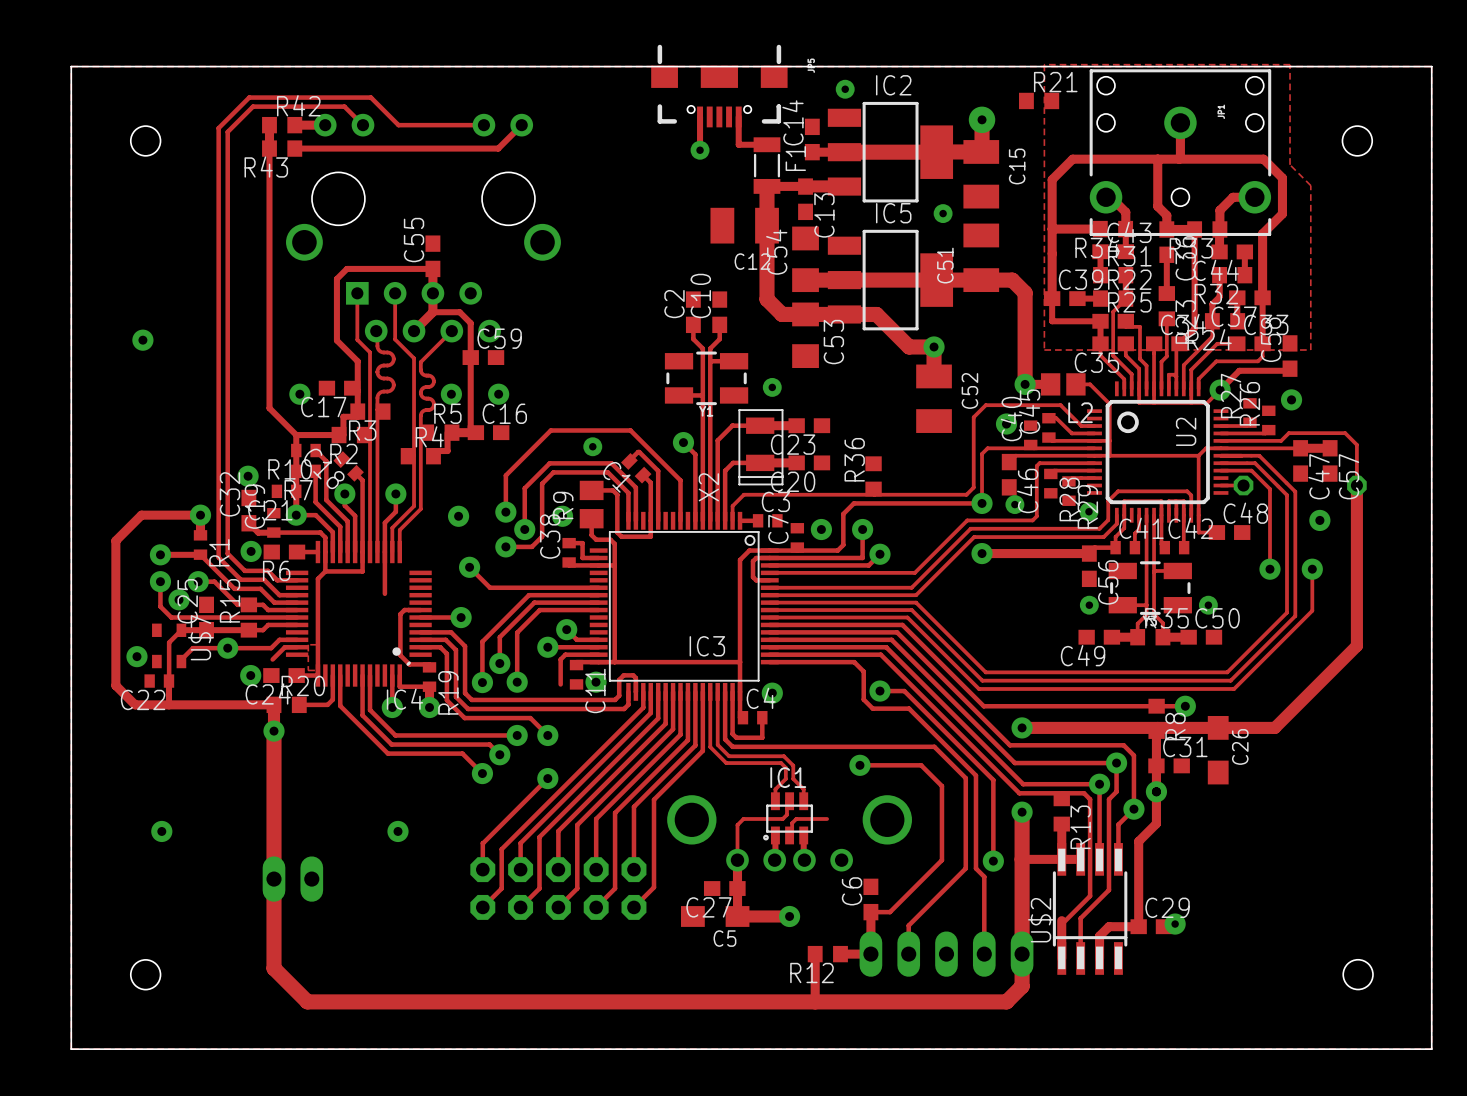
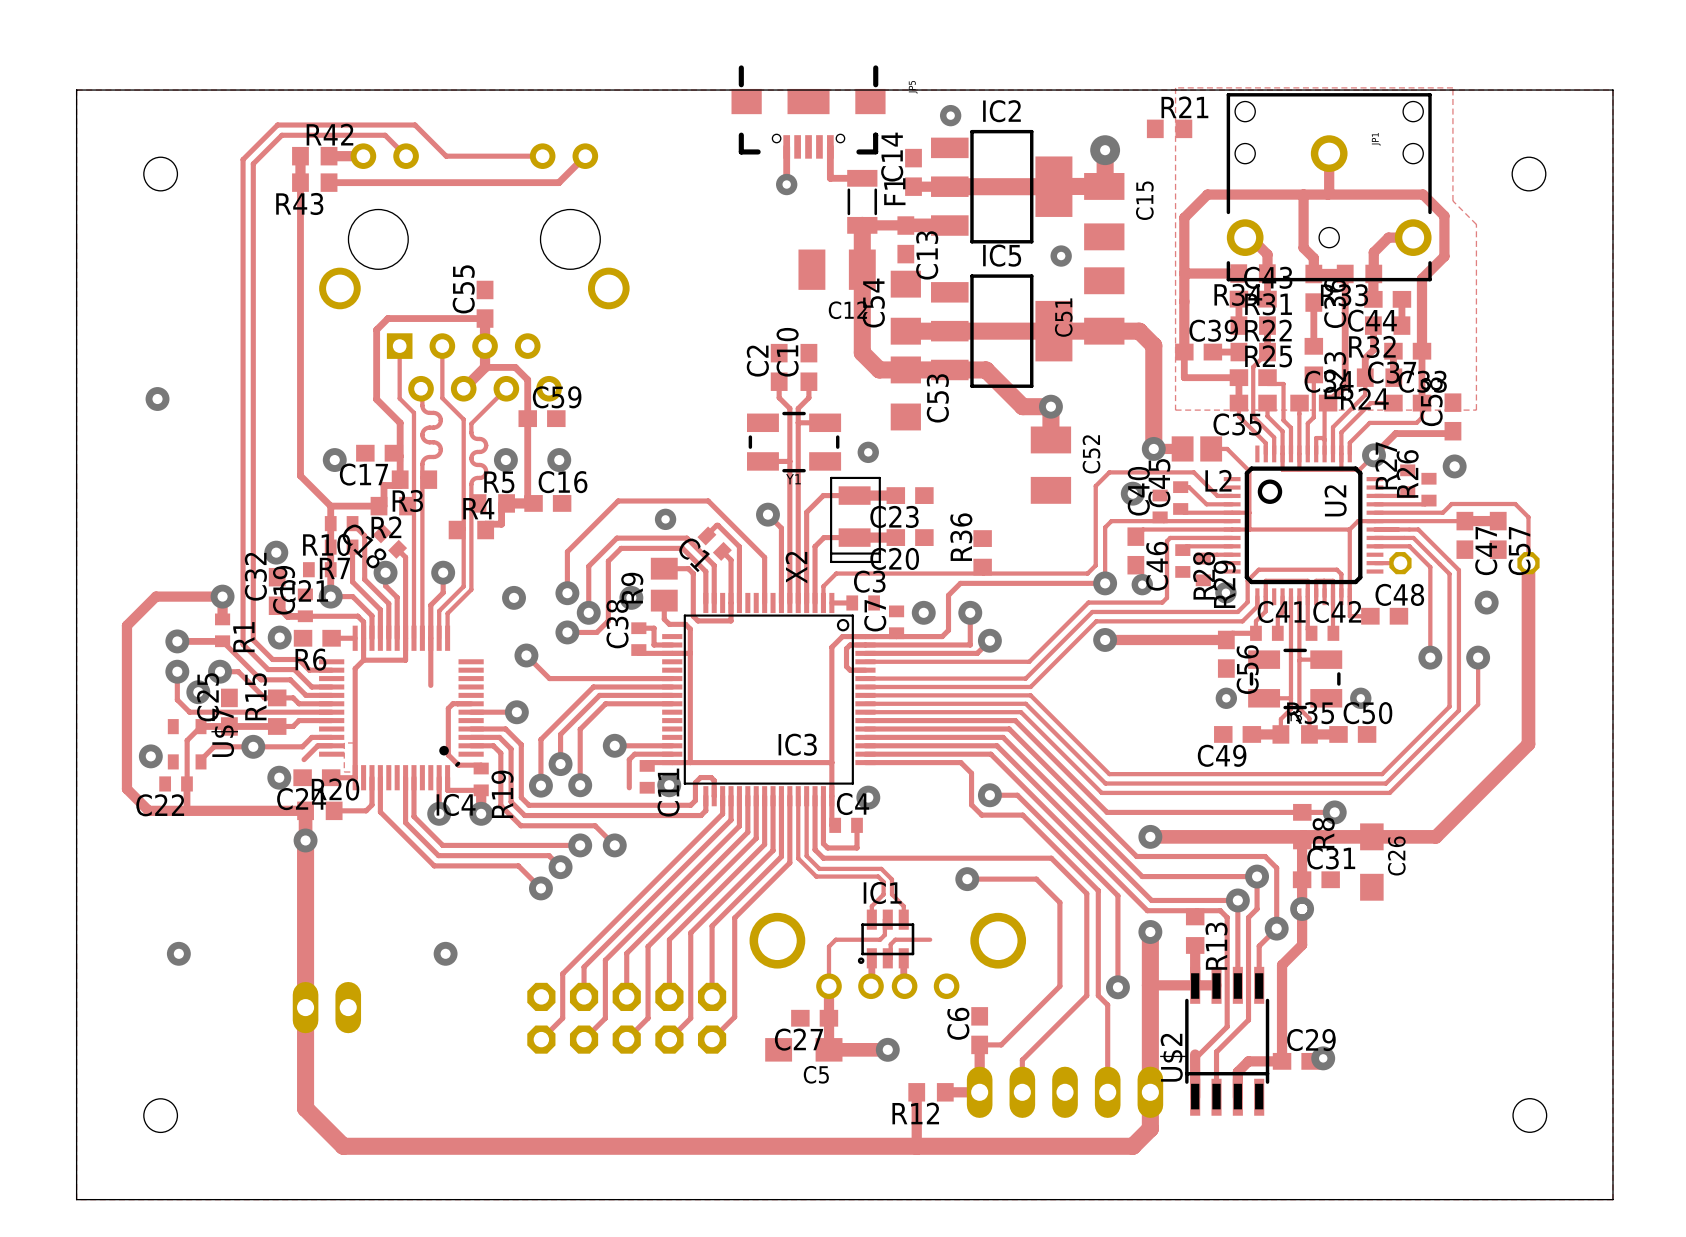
track: (566, 629) (576, 639) (598, 639) -> none
via: (566, 629) -> none
track: (547, 778) (482, 843) (482, 869) -> none
via: (547, 778) -> none

